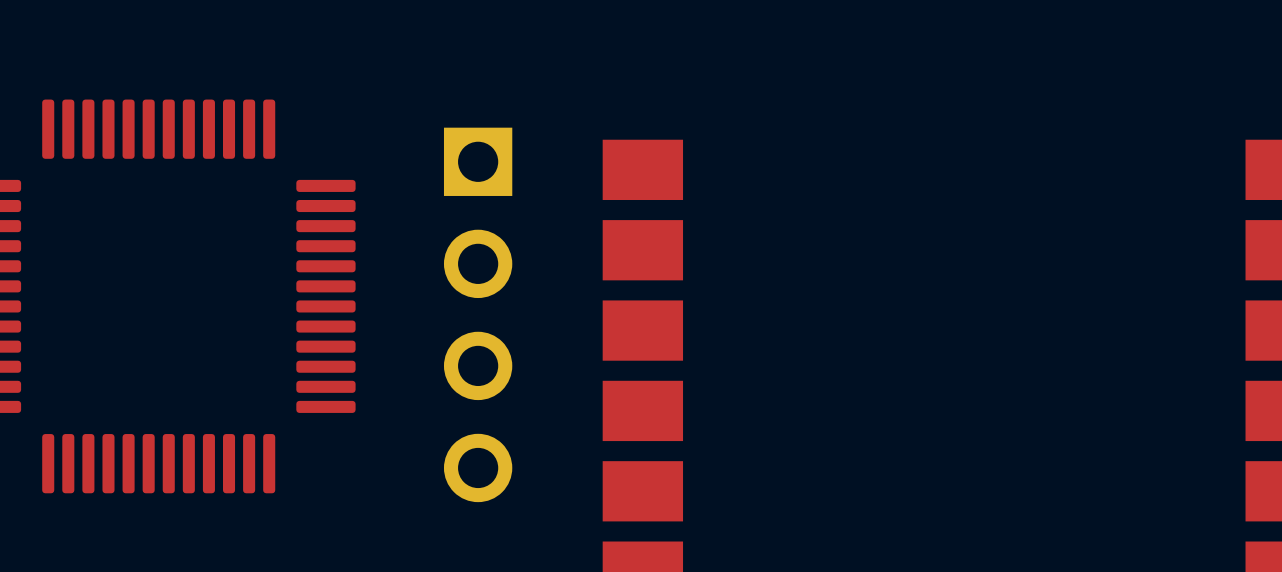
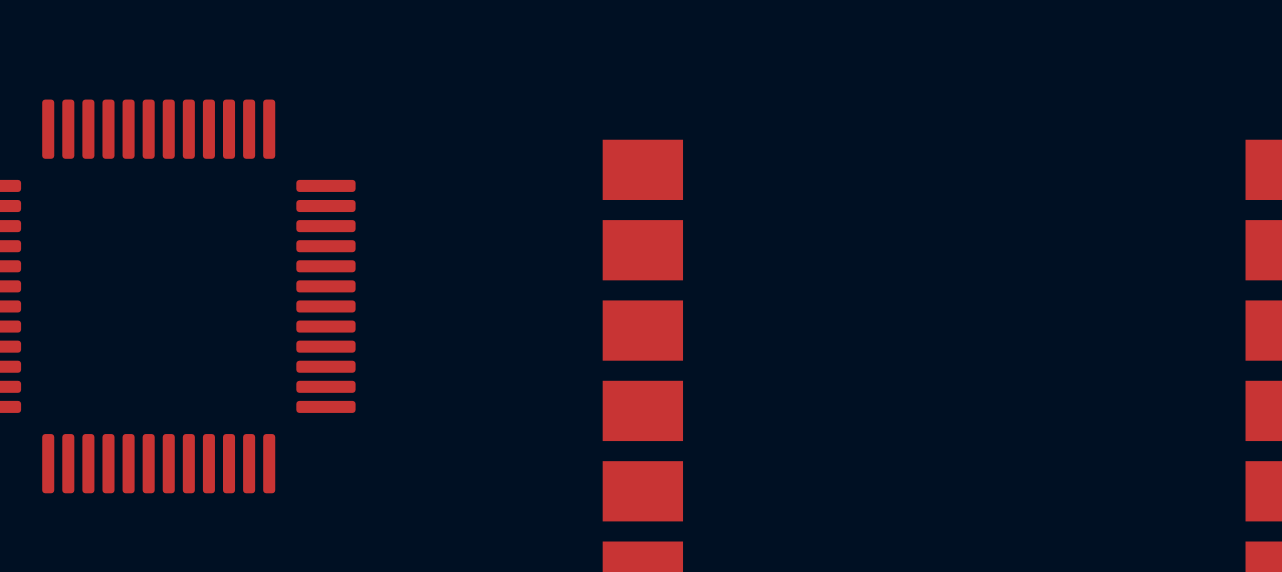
part: (478, 314) -> none

